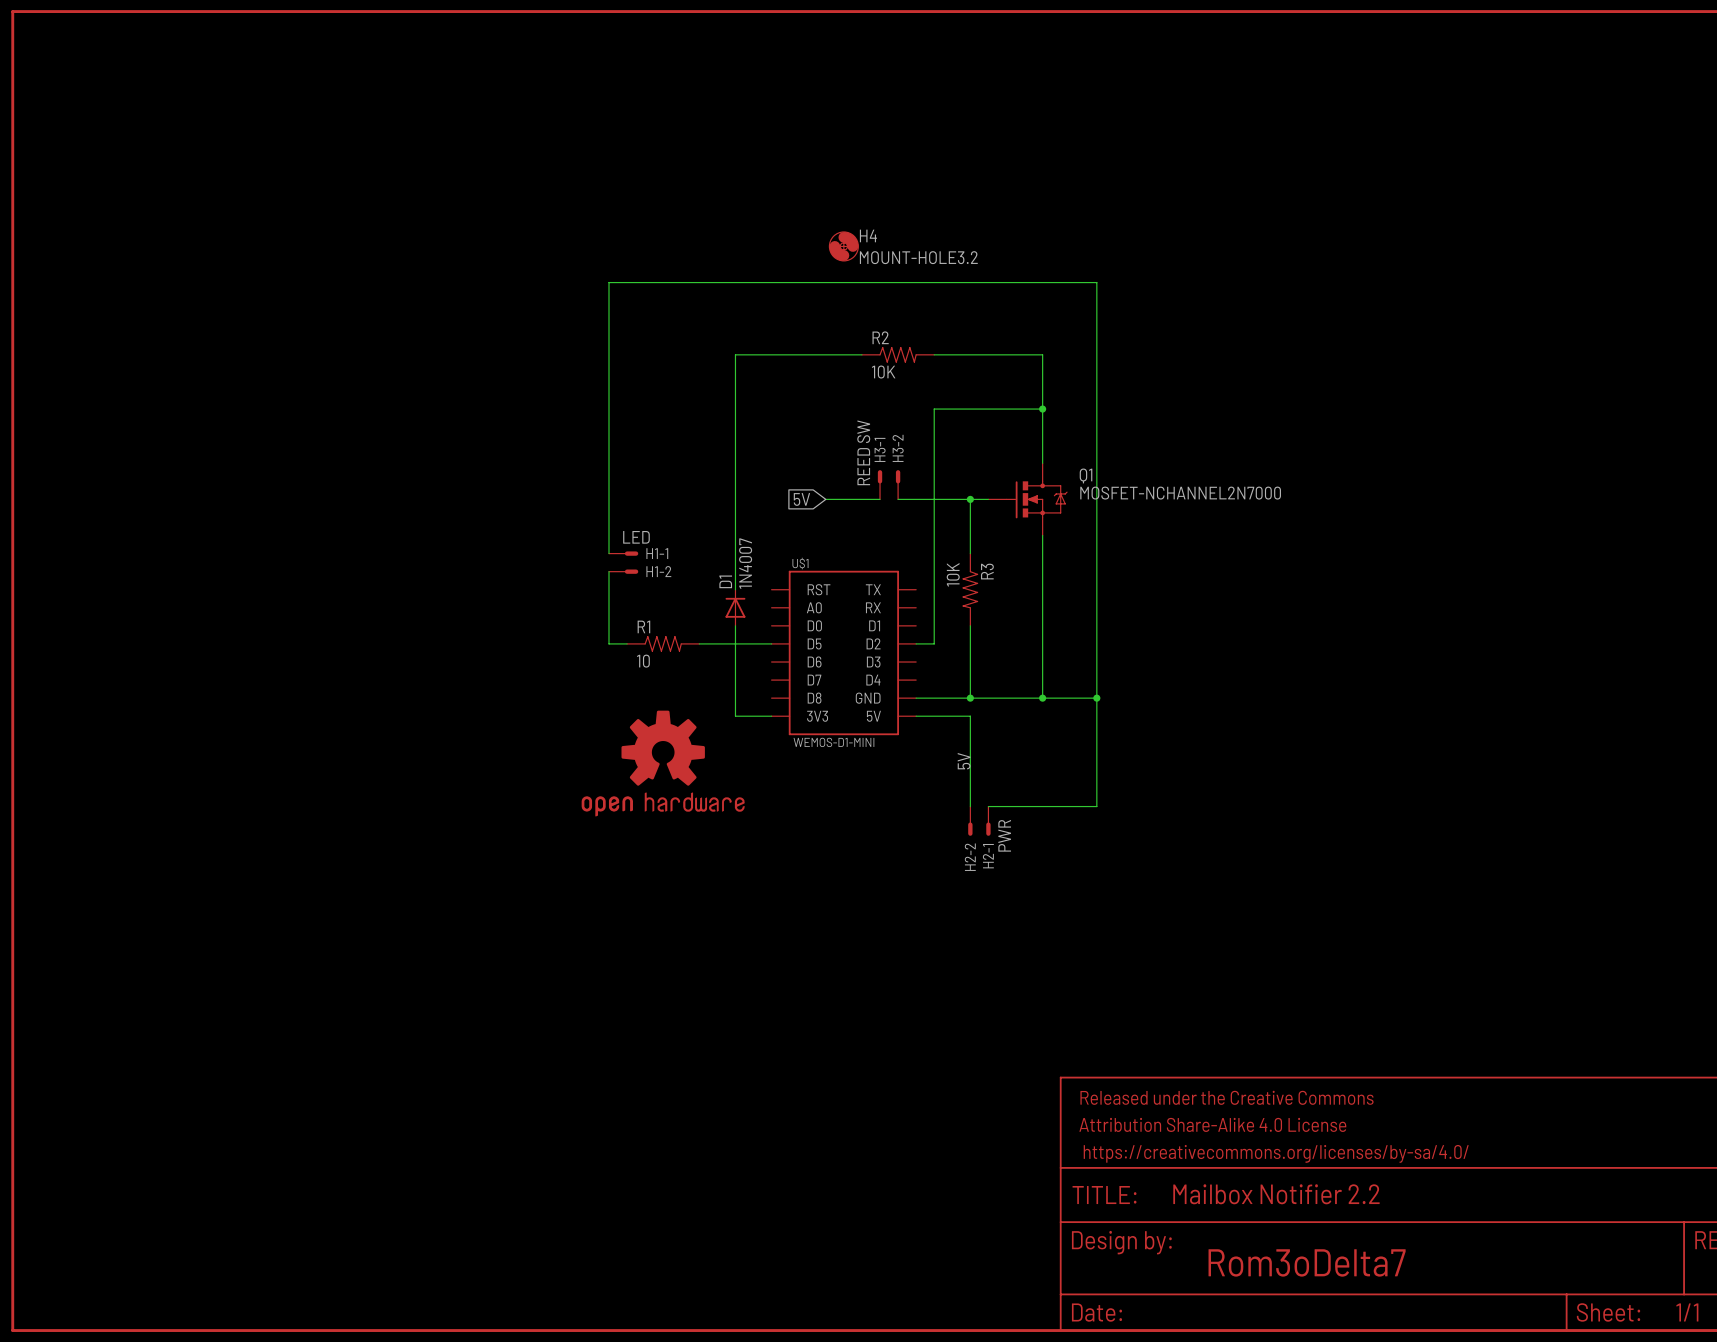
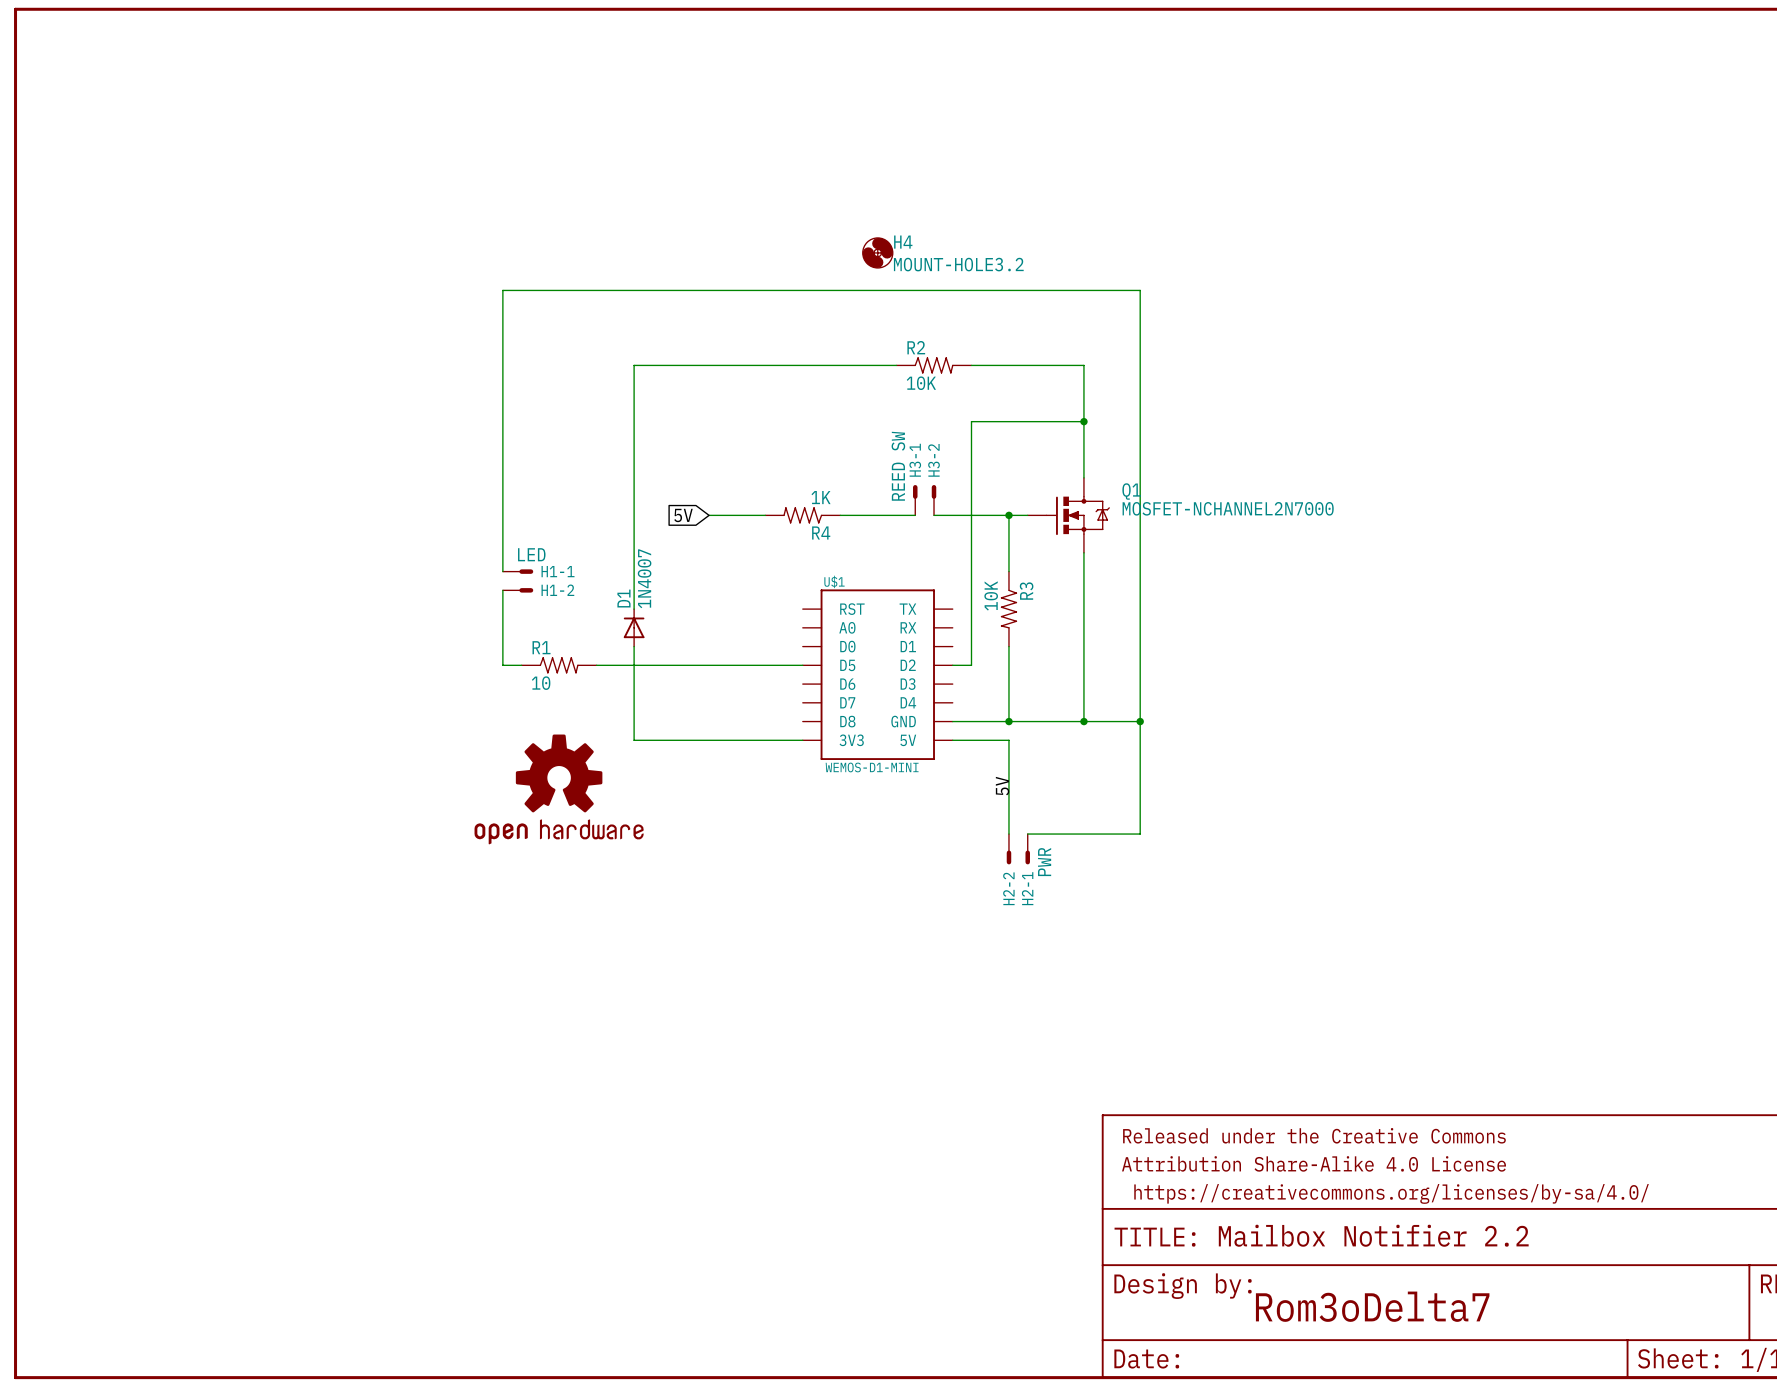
wire: (608, 282) (608, 354) -> (765, 365) (634, 365)
wire: none -> (634, 290) (502, 290) (502, 571)
wire: (735, 354) (735, 589) -> none
wire: none -> (709, 515) (765, 515)
R4: none -> 1K (802, 515)
global label position: 5V (801, 499) -> 5V (683, 515)
wire: none -> (840, 515) (859, 515)
wire: none -> (634, 571) (634, 590)
H1-1 position: (623, 553) -> (518, 571)
wire: none -> (502, 590) (502, 665) (521, 665)
H1-2 position: (623, 571) -> (518, 590)
D1 position: (735, 607) -> (634, 627)
wire: (735, 625) (735, 716) -> (596, 665) (634, 665) (634, 740) (765, 740)
R1 position: (663, 643) -> (559, 665)
part position: (663, 763) -> (559, 789)

